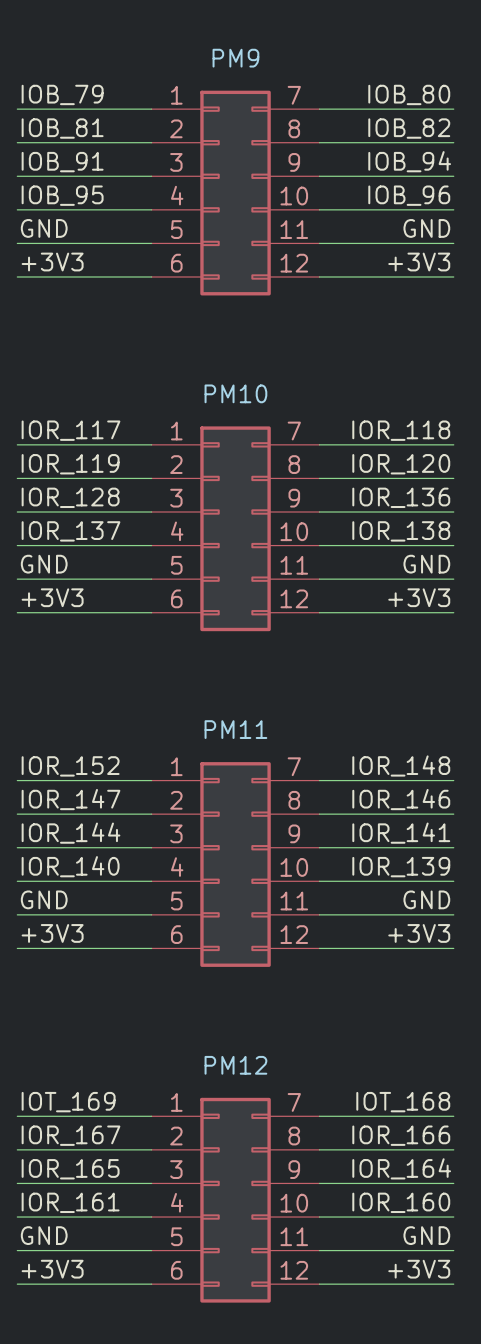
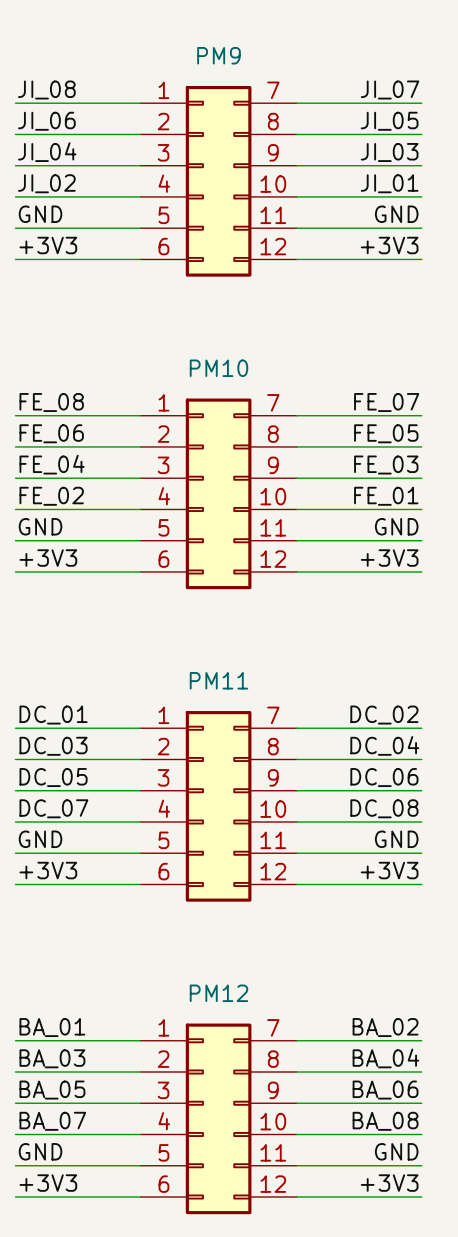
label: IOB_79 (62, 94) -> JI_08 (46, 90)
label: IOB_80 (409, 94) -> JI_07 (390, 90)
label: IOB_81 (62, 128) -> JI_06 (46, 121)
label: IOB_82 (409, 128) -> JI_05 (389, 121)
label: IOB_94 (409, 161) -> JI_03 (389, 152)
label: IOB_91 (62, 162) -> JI_04 (47, 152)
label: IOB_95 (62, 195) -> JI_02 (46, 183)
label: IOB_96 (409, 195) -> JI_01 (389, 183)
label: IOR_117 (70, 430) -> FE_08 (51, 402)
label: IOR_118 (401, 430) -> FE_07 (386, 402)
label: IOR_119 (70, 464) -> FE_06 (51, 433)
label: IOR_120 (401, 464) -> FE_05 (386, 433)
label: IOR_128 (70, 497) -> FE_04 (52, 464)
label: IOR_136 (401, 497) -> FE_03 (386, 465)
label: IOR_137 (70, 531) -> FE_02 (51, 496)
label: IOR_138 (401, 531) -> FE_01 (386, 496)
label: IOR_148 (401, 765) -> DC_02 (384, 715)
label: IOR_152 (70, 766) -> DC_01 (53, 715)
label: IOR_147 (70, 799) -> DC_03 (53, 746)
label: IOR_146 (401, 799) -> DC_04 (384, 745)
label: IOR_144 (70, 833) -> DC_05 (53, 777)
label: IOR_141 (401, 833) -> DC_06 (384, 777)
label: IOR_140 (70, 866) -> DC_07 (53, 808)
label: IOR_139 (401, 867) -> DC_08 (384, 808)
label: IOT_169 (68, 1102) -> BA_01 (52, 1027)
label: IOT_168 (403, 1102) -> BA_02 (385, 1027)
label: IOR_167 (70, 1135) -> BA_03 (52, 1058)
label: IOR_166 (401, 1135) -> BA_04 (385, 1058)
label: IOR_164 (401, 1168) -> BA_06 (385, 1090)
label: IOR_165 (70, 1169) -> BA_05 (52, 1090)
label: IOR_161 (70, 1202) -> BA_07 (52, 1121)
label: IOR_160 (401, 1202) -> BA_08 (385, 1121)

